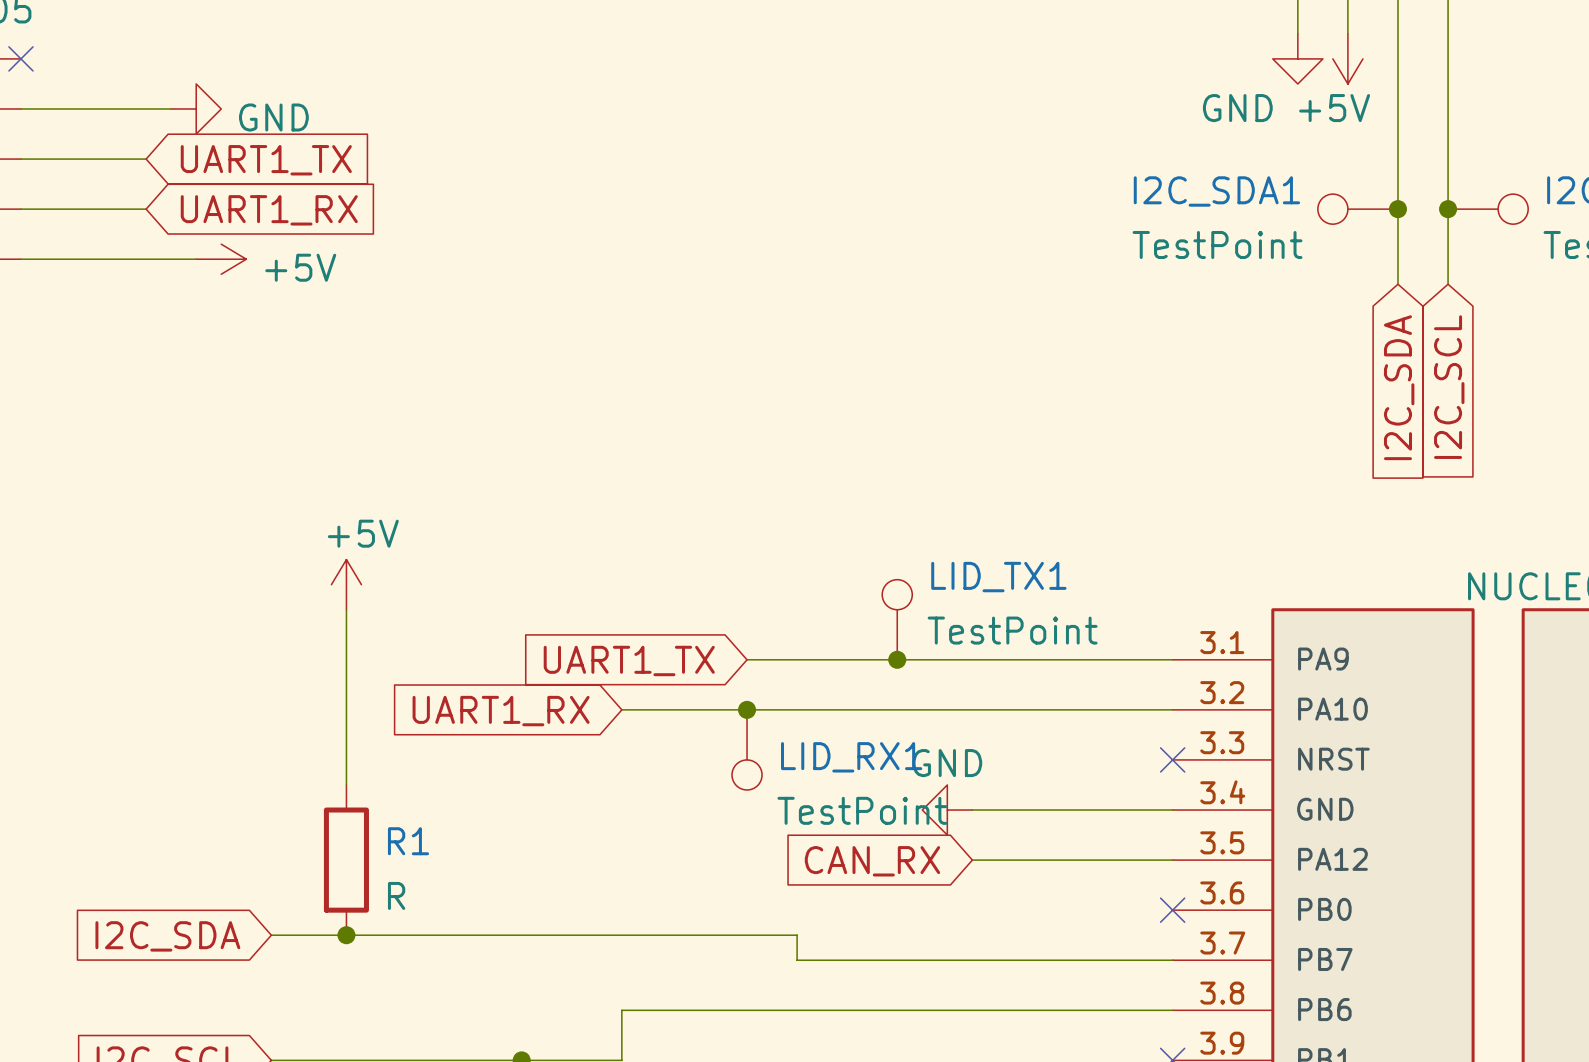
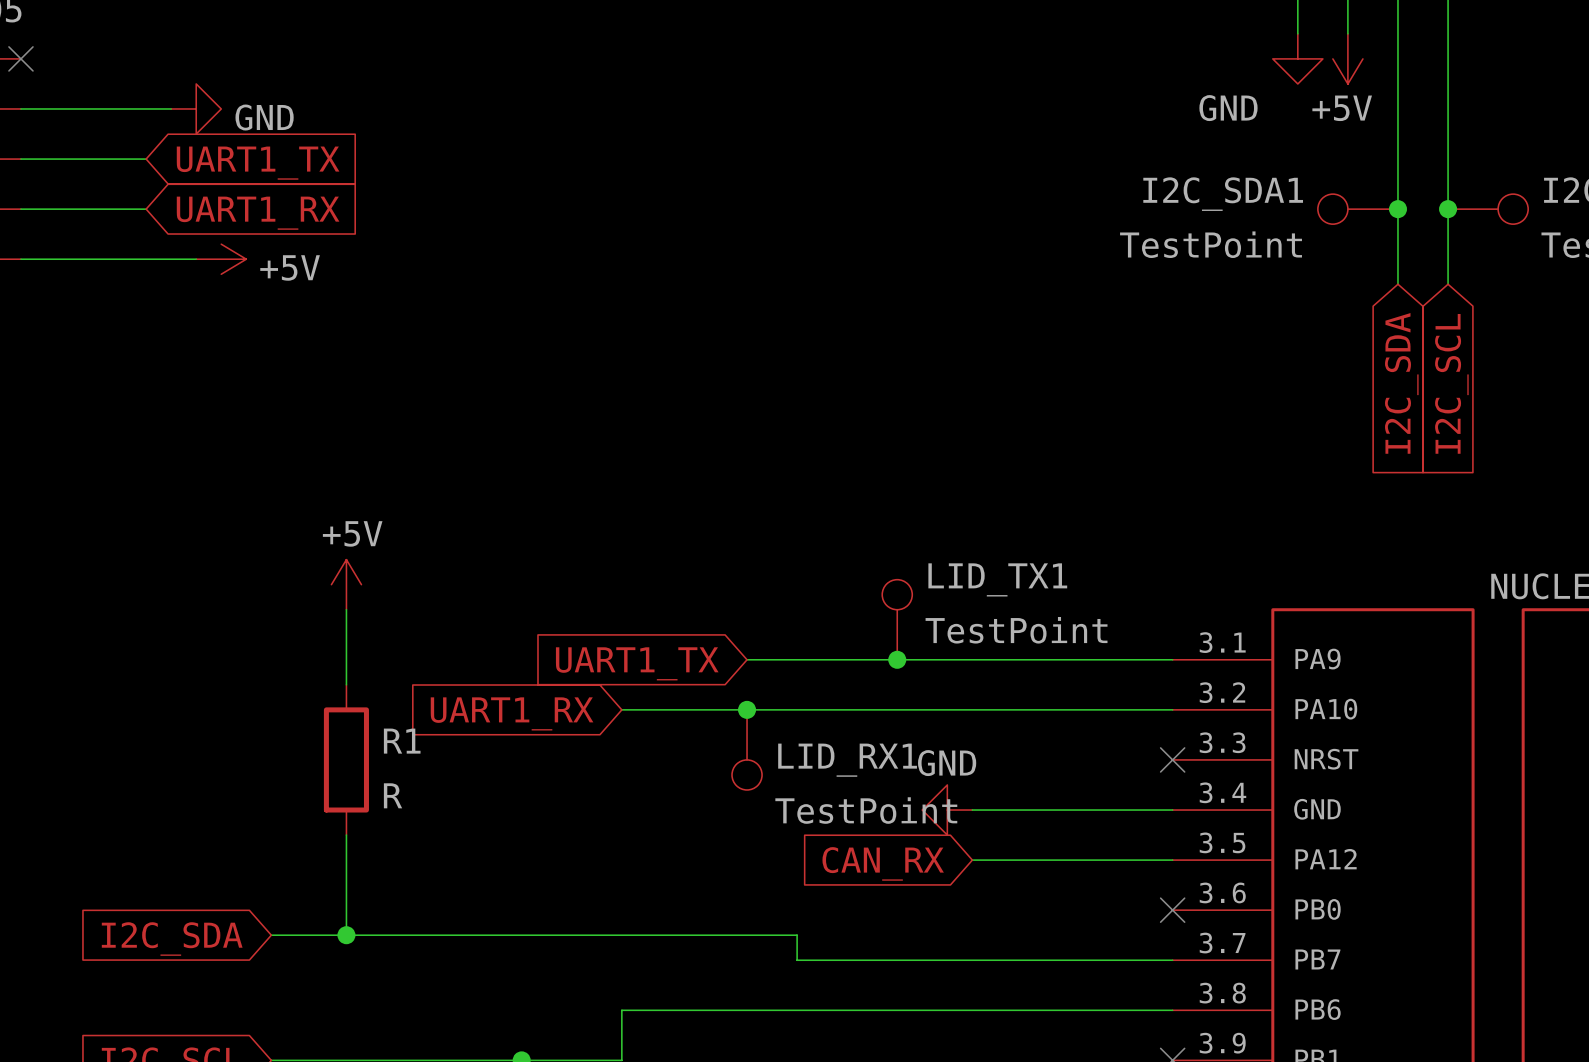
wire: (346, 684) (346, 784) -> (346, 835) (346, 935)
R1 position: (346, 860) -> (346, 759)

